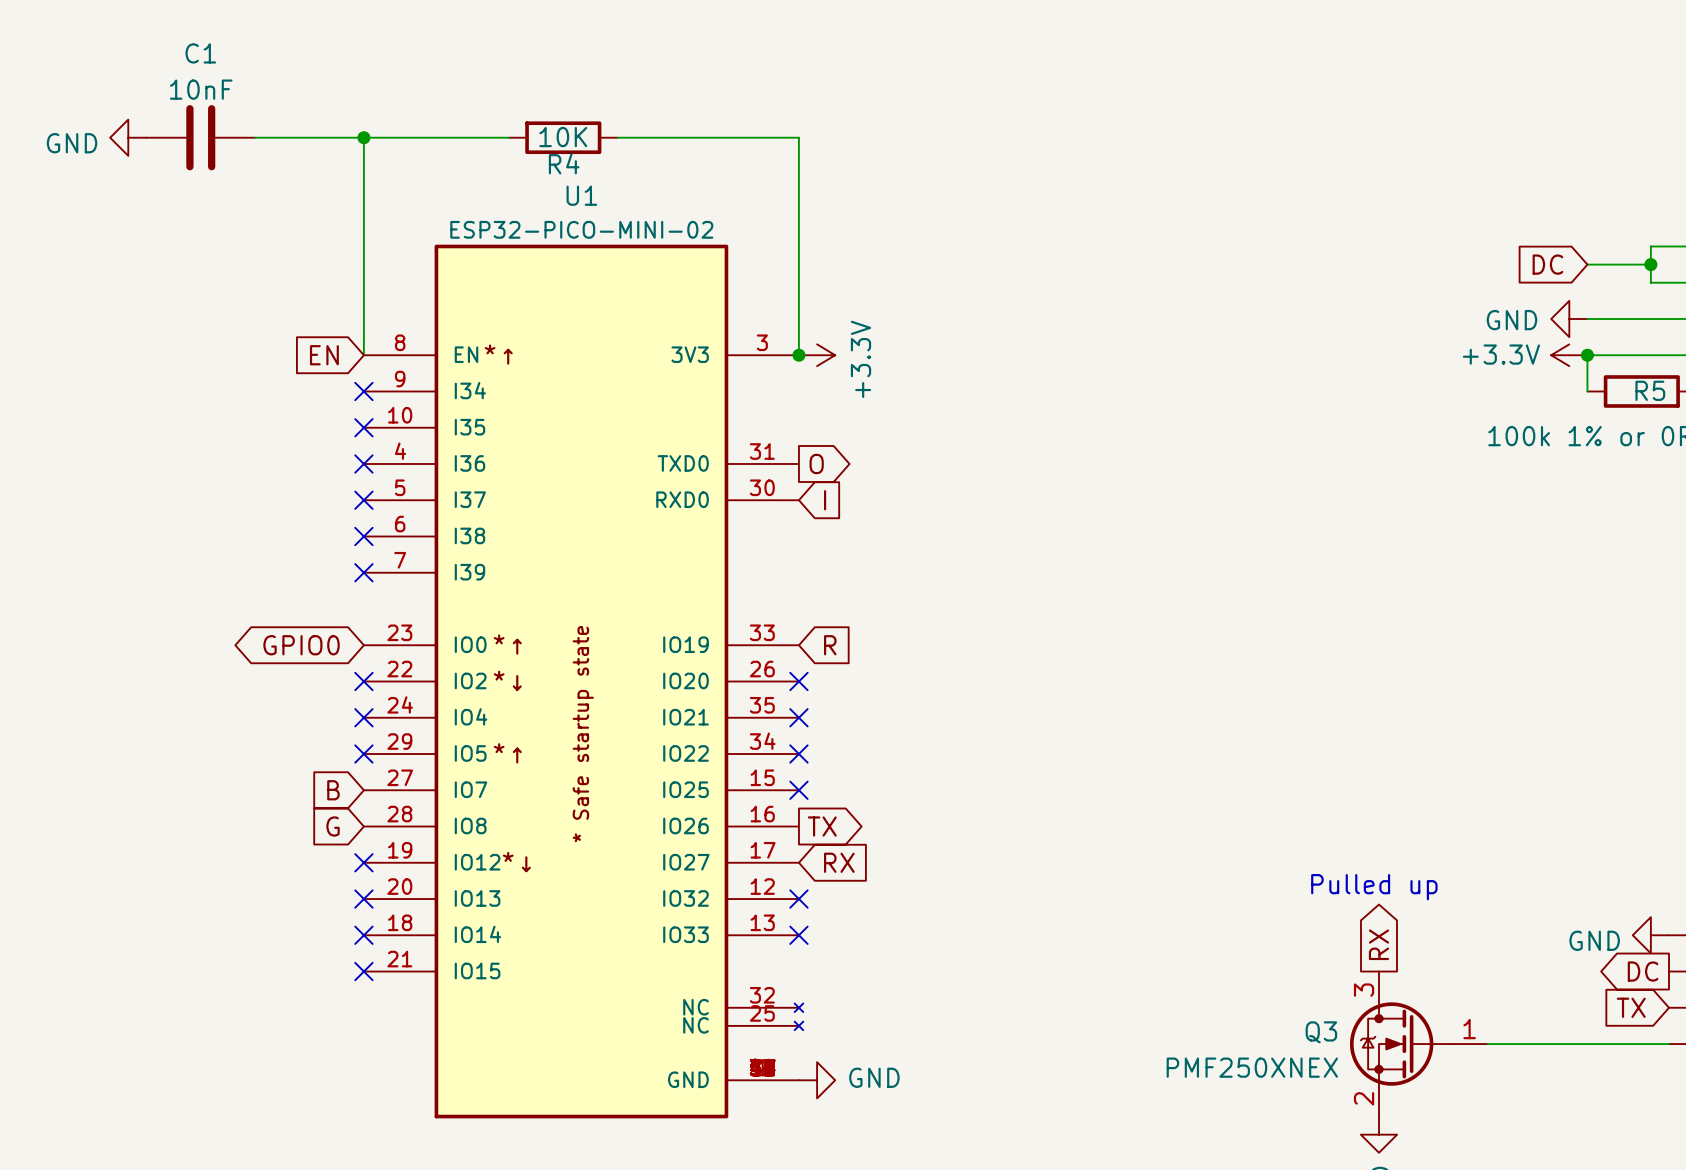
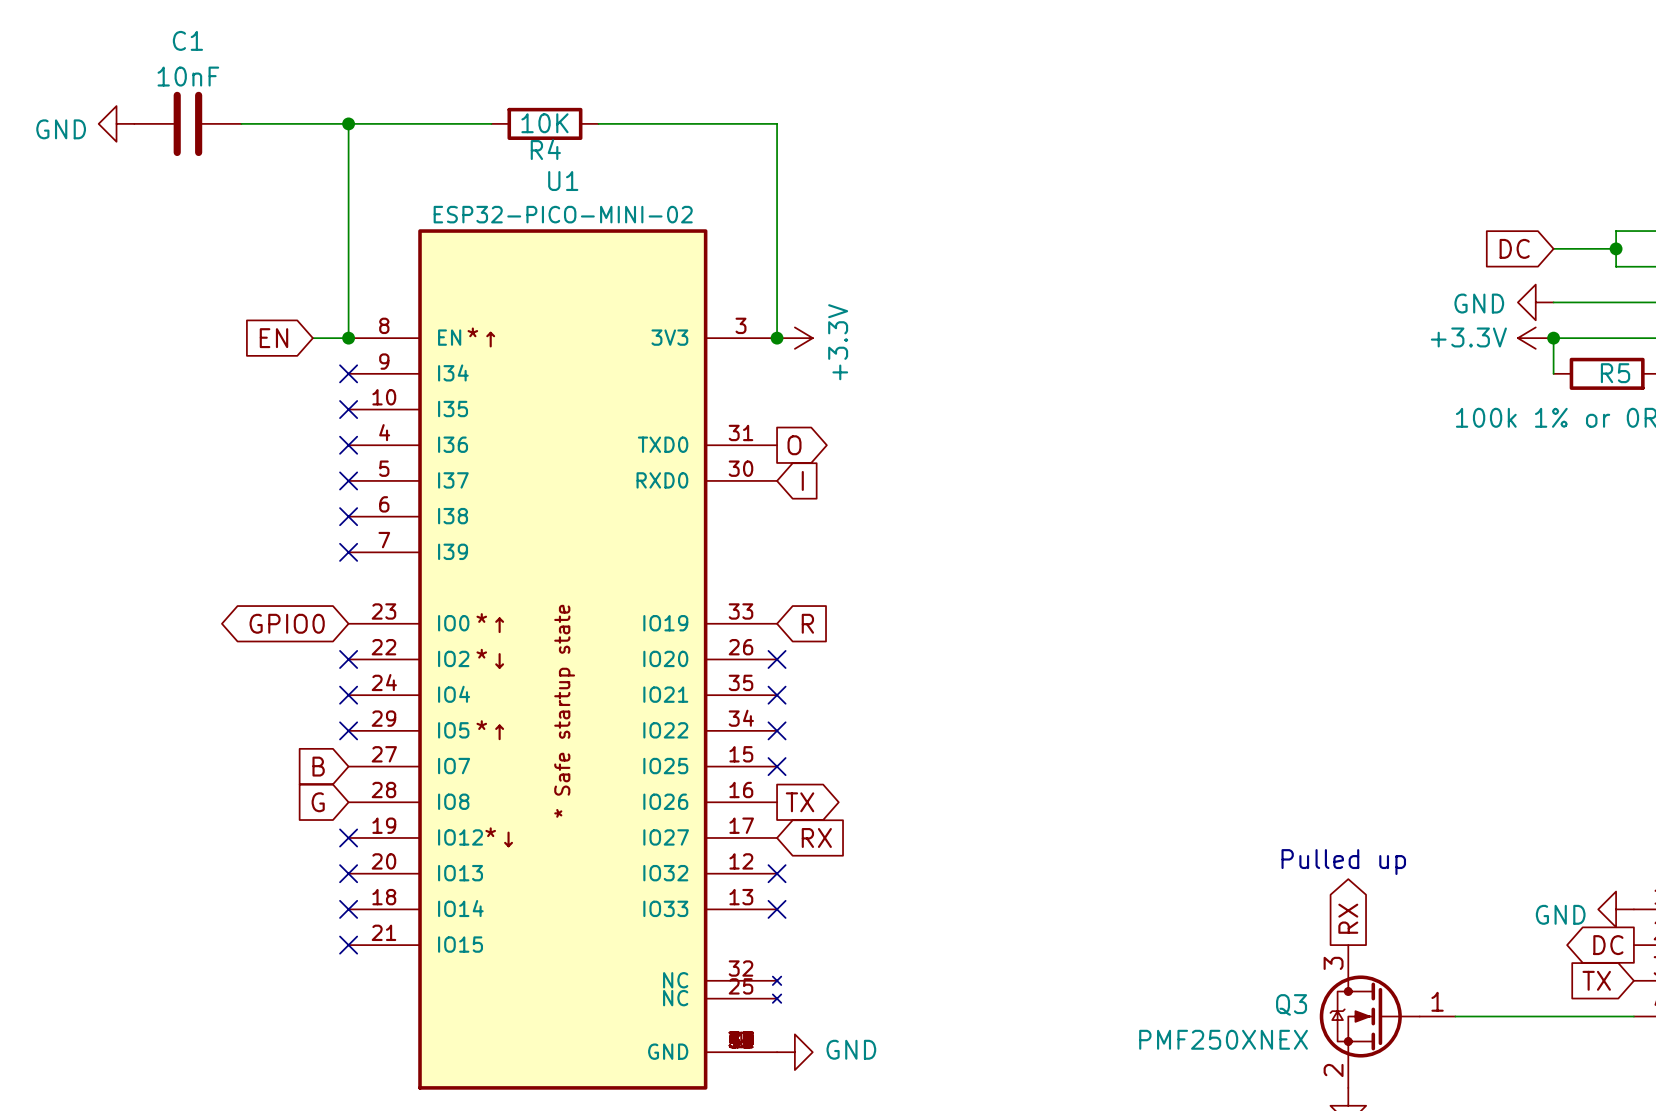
global label position: EN (324, 355) -> EN (273, 338)
wire: none -> (312, 338) (348, 338)
junction: none -> (348, 338)

